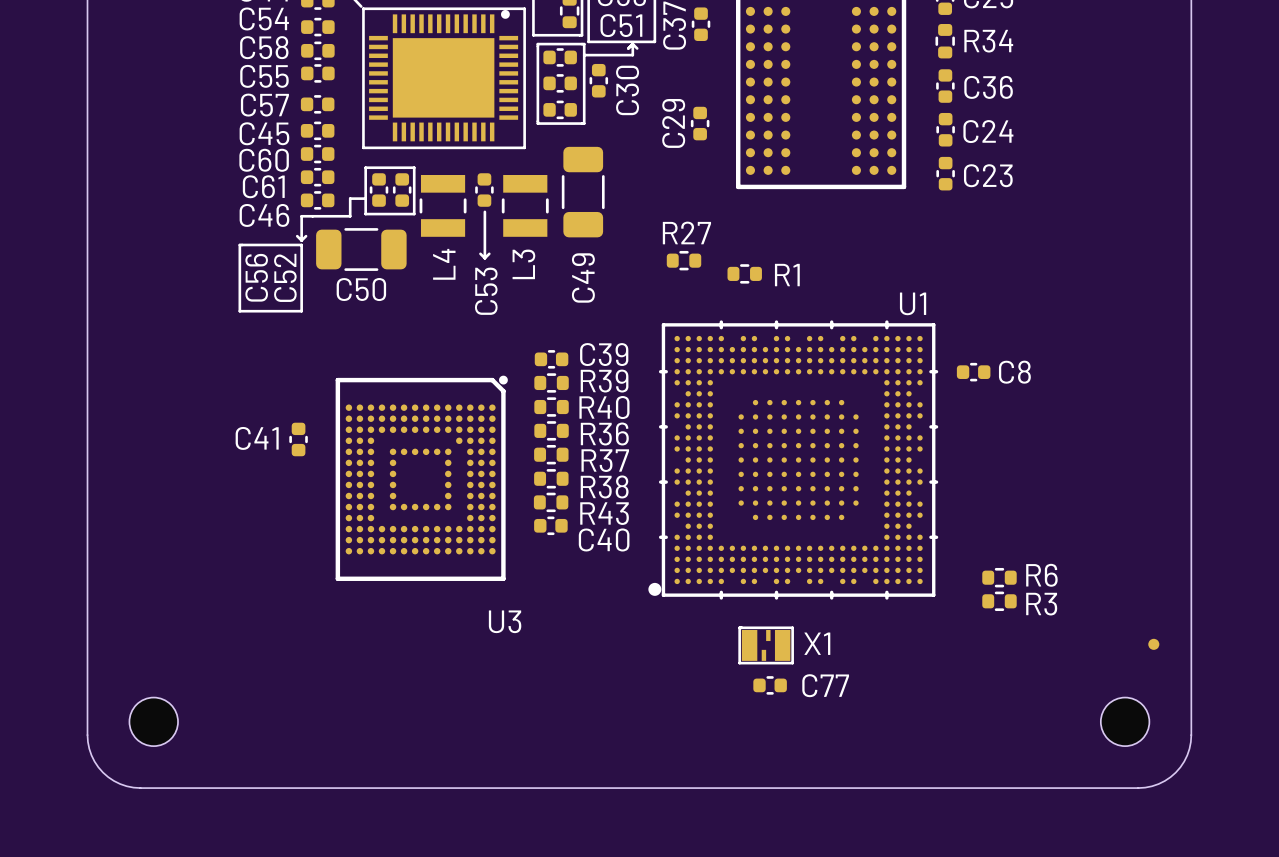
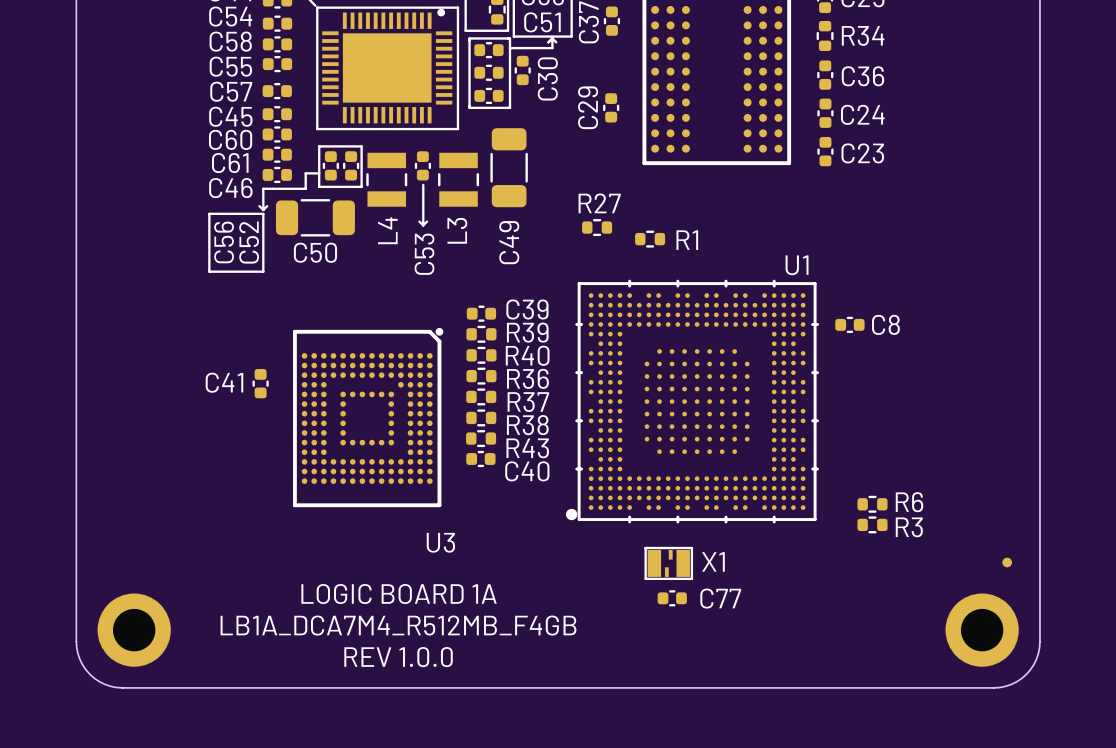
text: none -> LOGIC BOARD 1A (399, 594)
part footprint: [129, 697, 179, 747] -> [97, 593, 171, 667]
part footprint: [1100, 697, 1150, 747] -> [945, 593, 1019, 667]
text: none -> LB1A_DCA7M4_R512MB_F4GB (398, 625)
text: none -> REV 1.0.0 (398, 657)

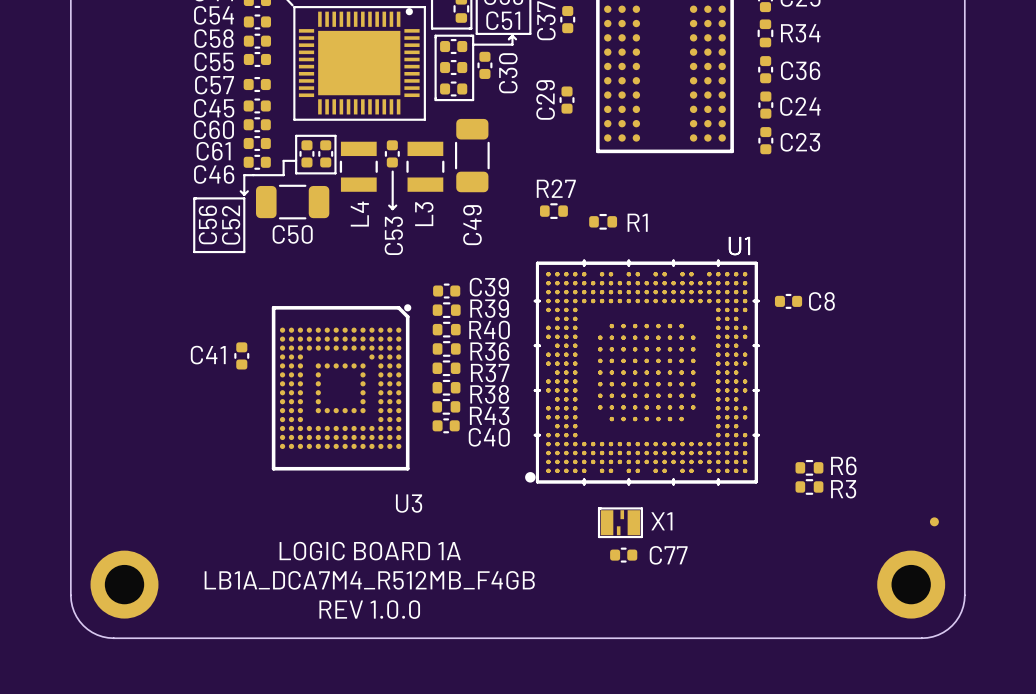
U1: none -> (646, 372)

